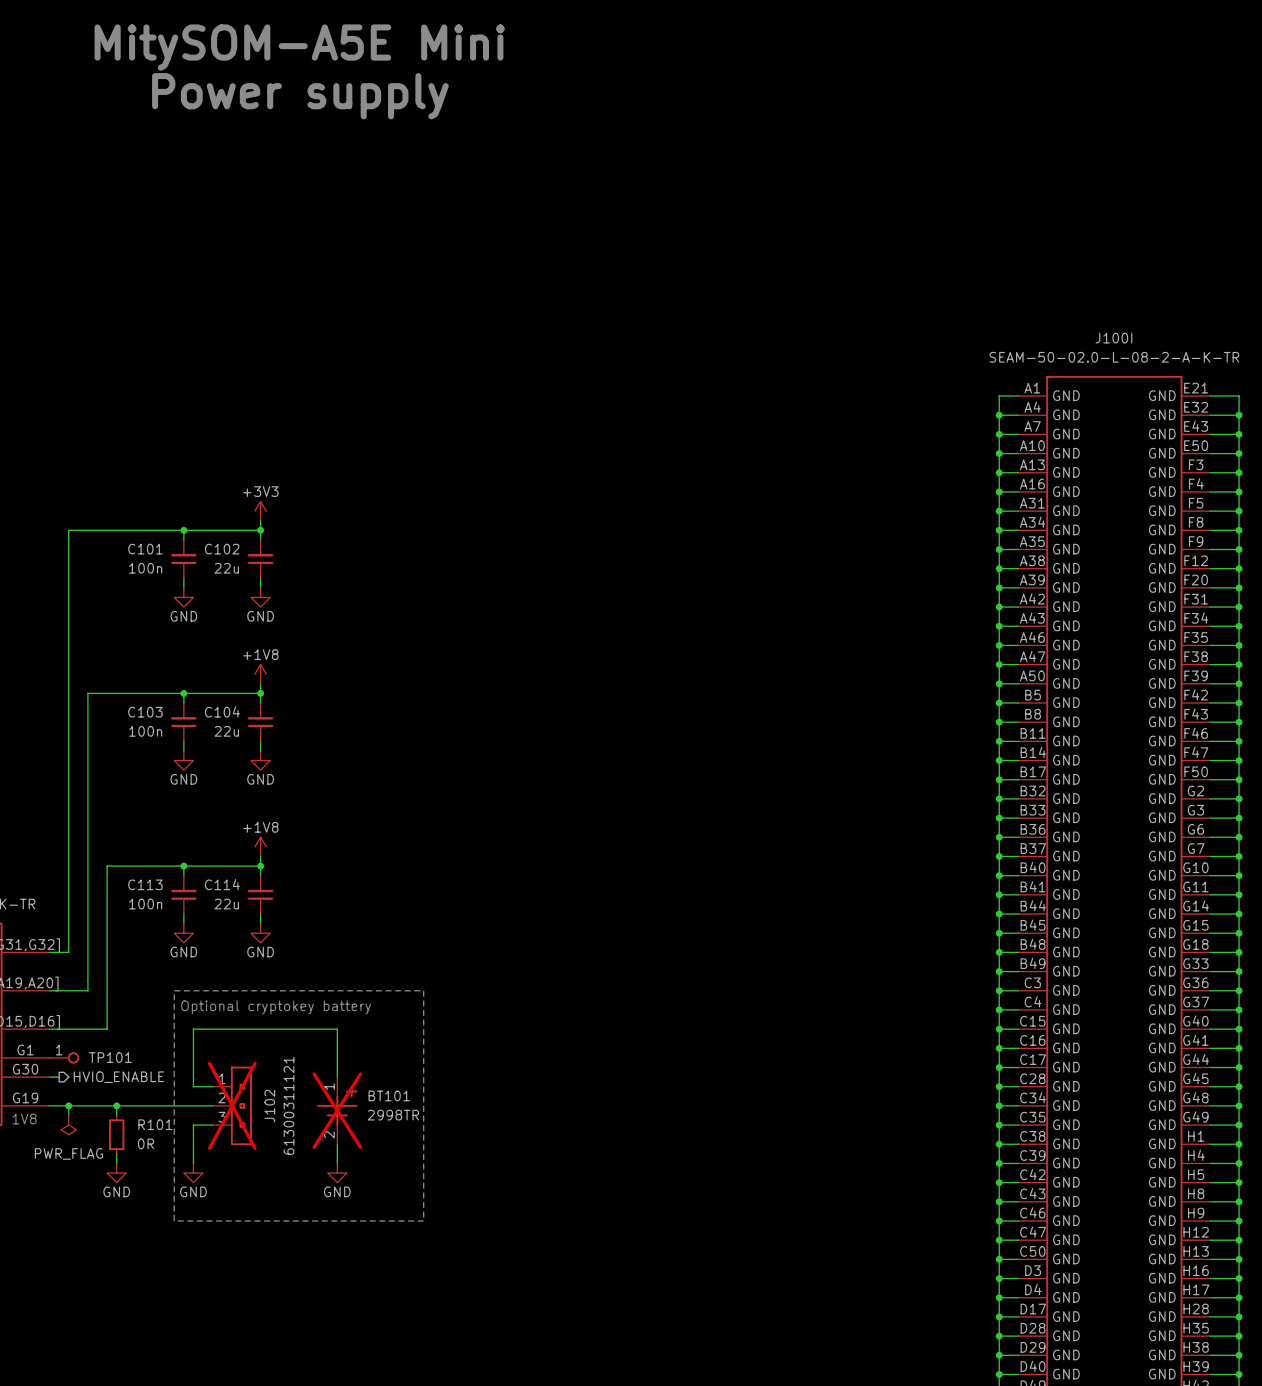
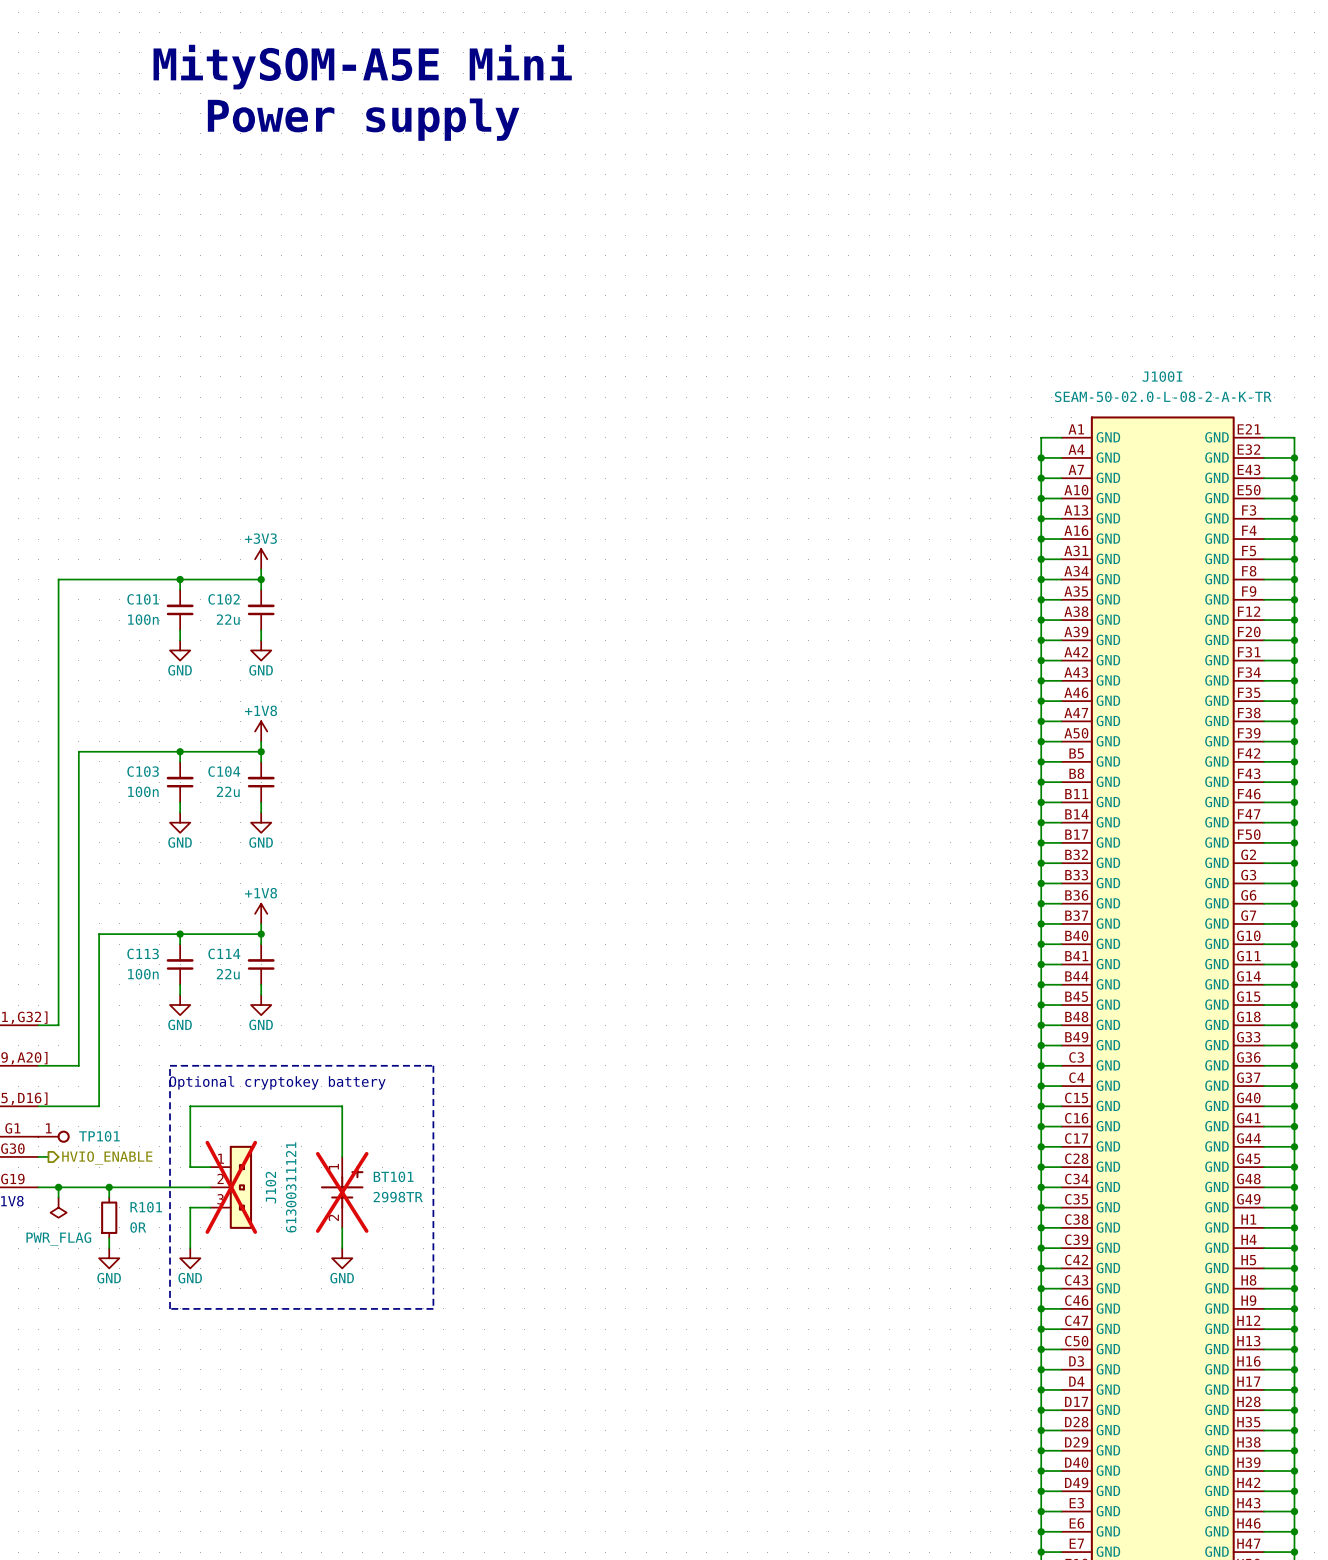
text position: MitySOM-A5E Mini (299, 47) -> MitySOM-A5E Mini (362, 67)
text position: Power supply (300, 96) -> Power supply (363, 119)

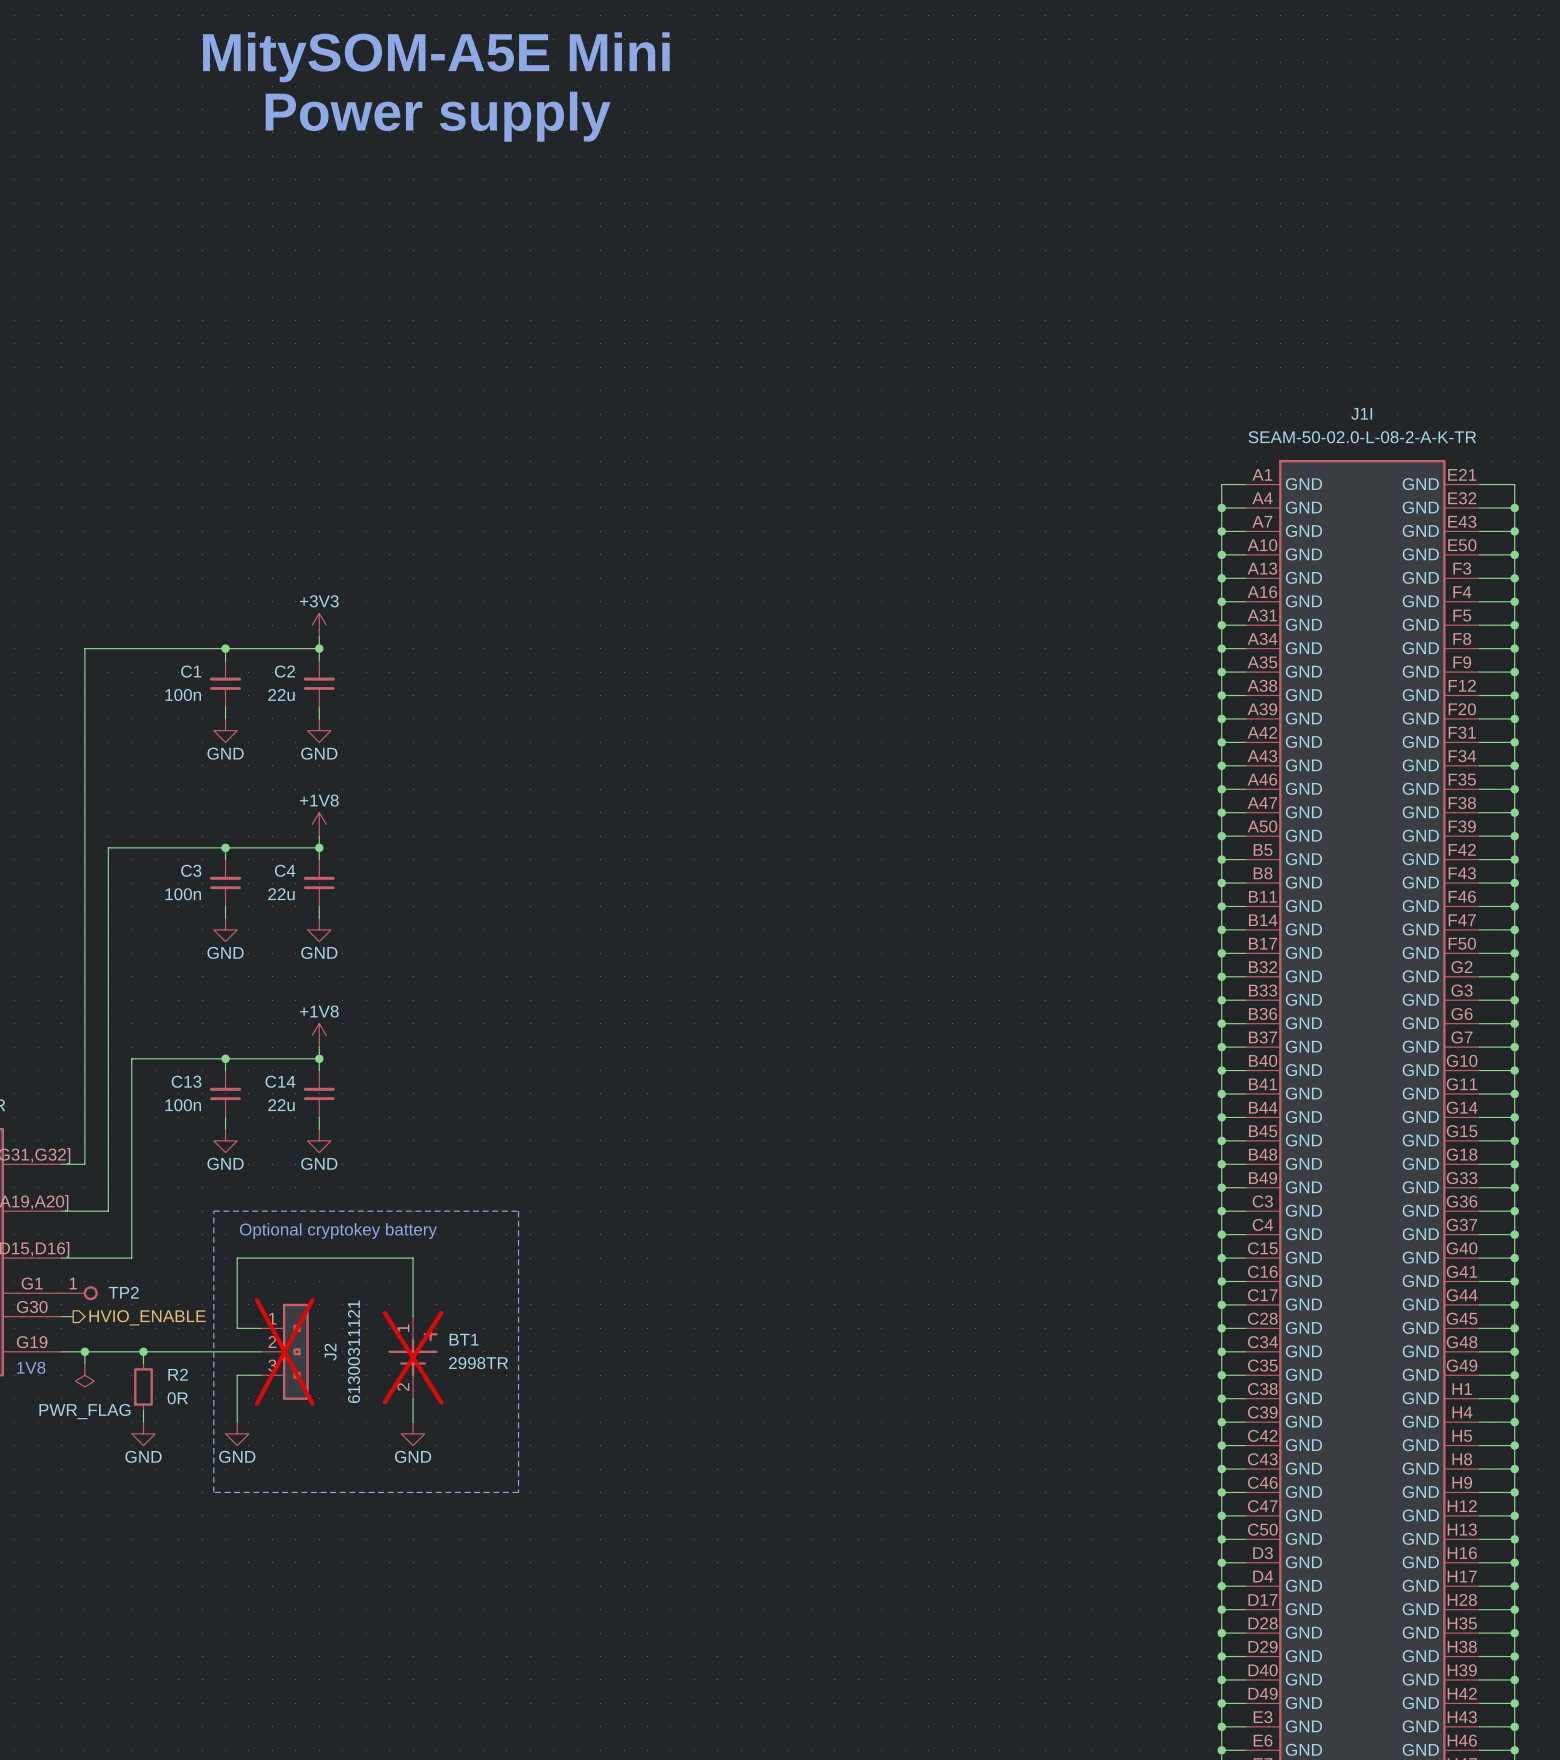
J100I name: J100I (1162, 376) -> J1I (1361, 413)
C101 name: C101 (143, 599) -> C1 (191, 671)
C102 name: C102 (224, 599) -> C2 (284, 671)
C103 name: C103 (143, 771) -> C3 (191, 870)
C104 name: C104 (224, 771) -> C4 (285, 870)
C113 name: C113 (143, 953) -> C13 (186, 1081)
C114 name: C114 (224, 953) -> C14 (280, 1081)
TP101 name: TP101 (99, 1136) -> TP2 (123, 1292)
BT101 name: BT101 (393, 1176) -> BT1 (464, 1339)
J102 name: J102 (270, 1187) -> J2 (330, 1352)
R101 name: R101 (146, 1207) -> R2 (178, 1374)

